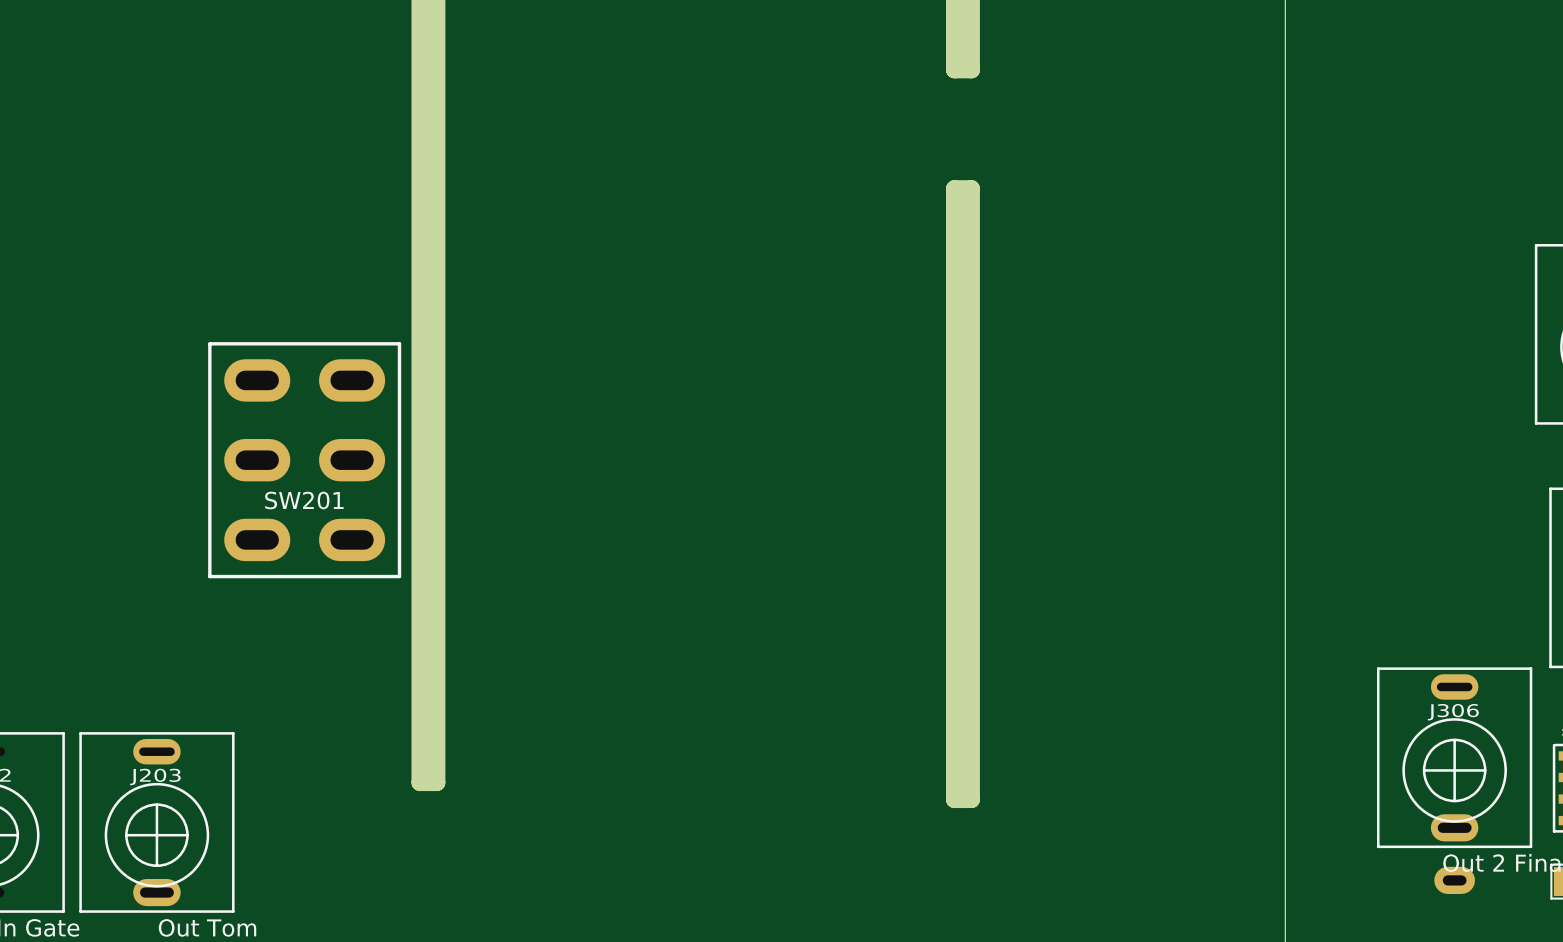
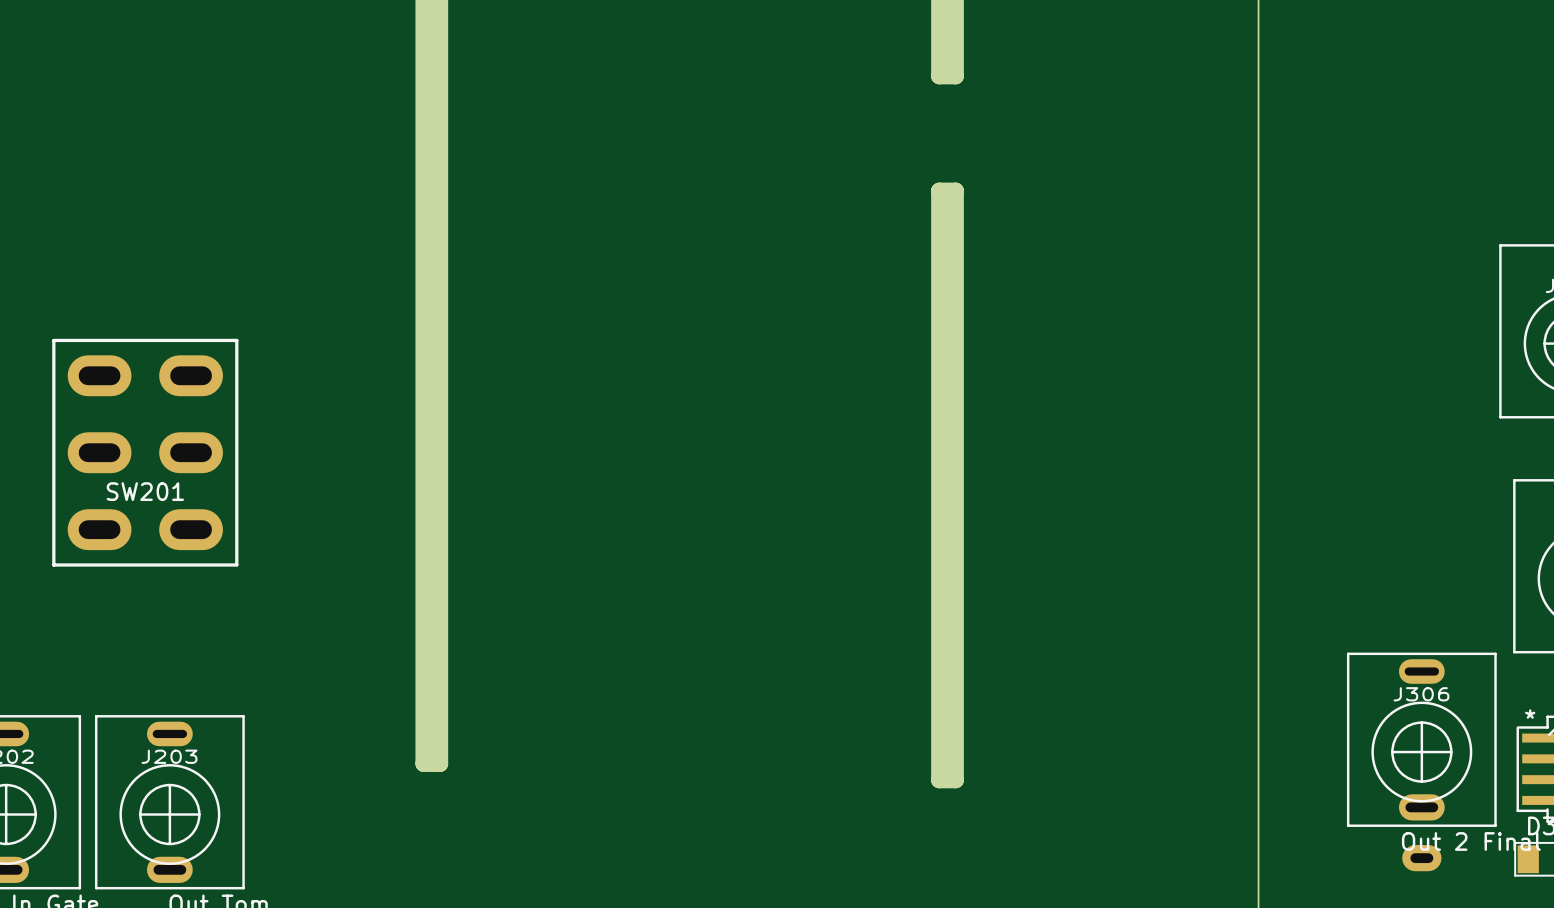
SW201 position: (304, 460) -> (145, 452)

